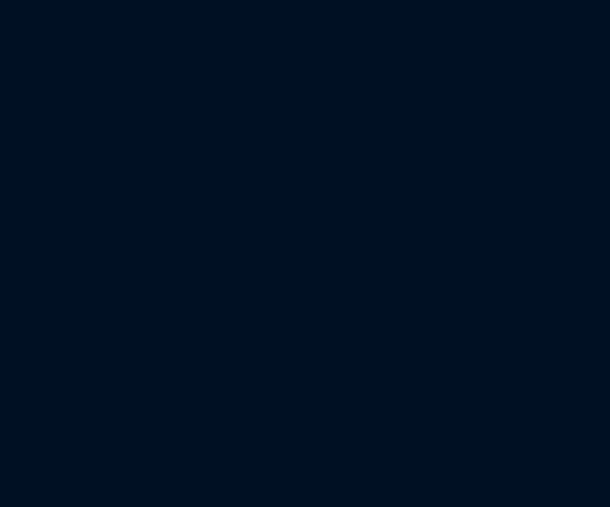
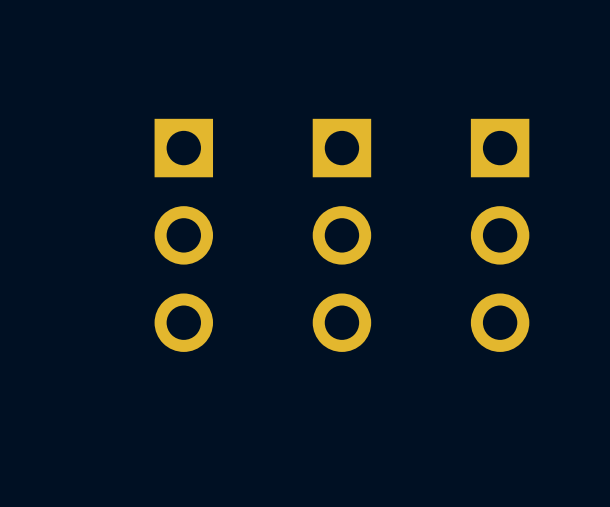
part: none -> (183, 235)
part: none -> (341, 235)
part: none -> (500, 235)

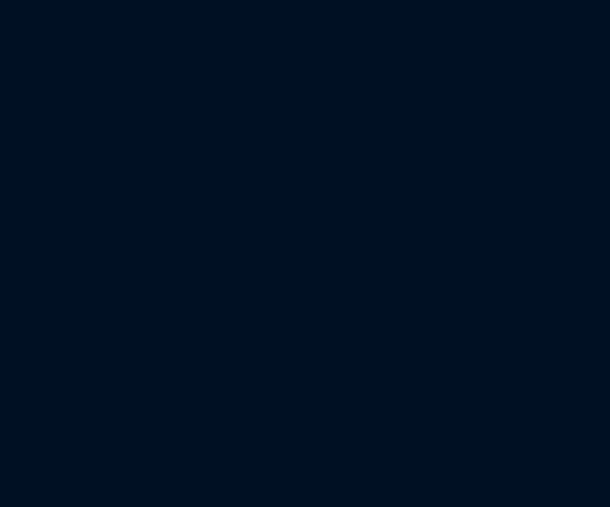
part: (183, 235) -> none
part: (341, 235) -> none
part: (500, 235) -> none

